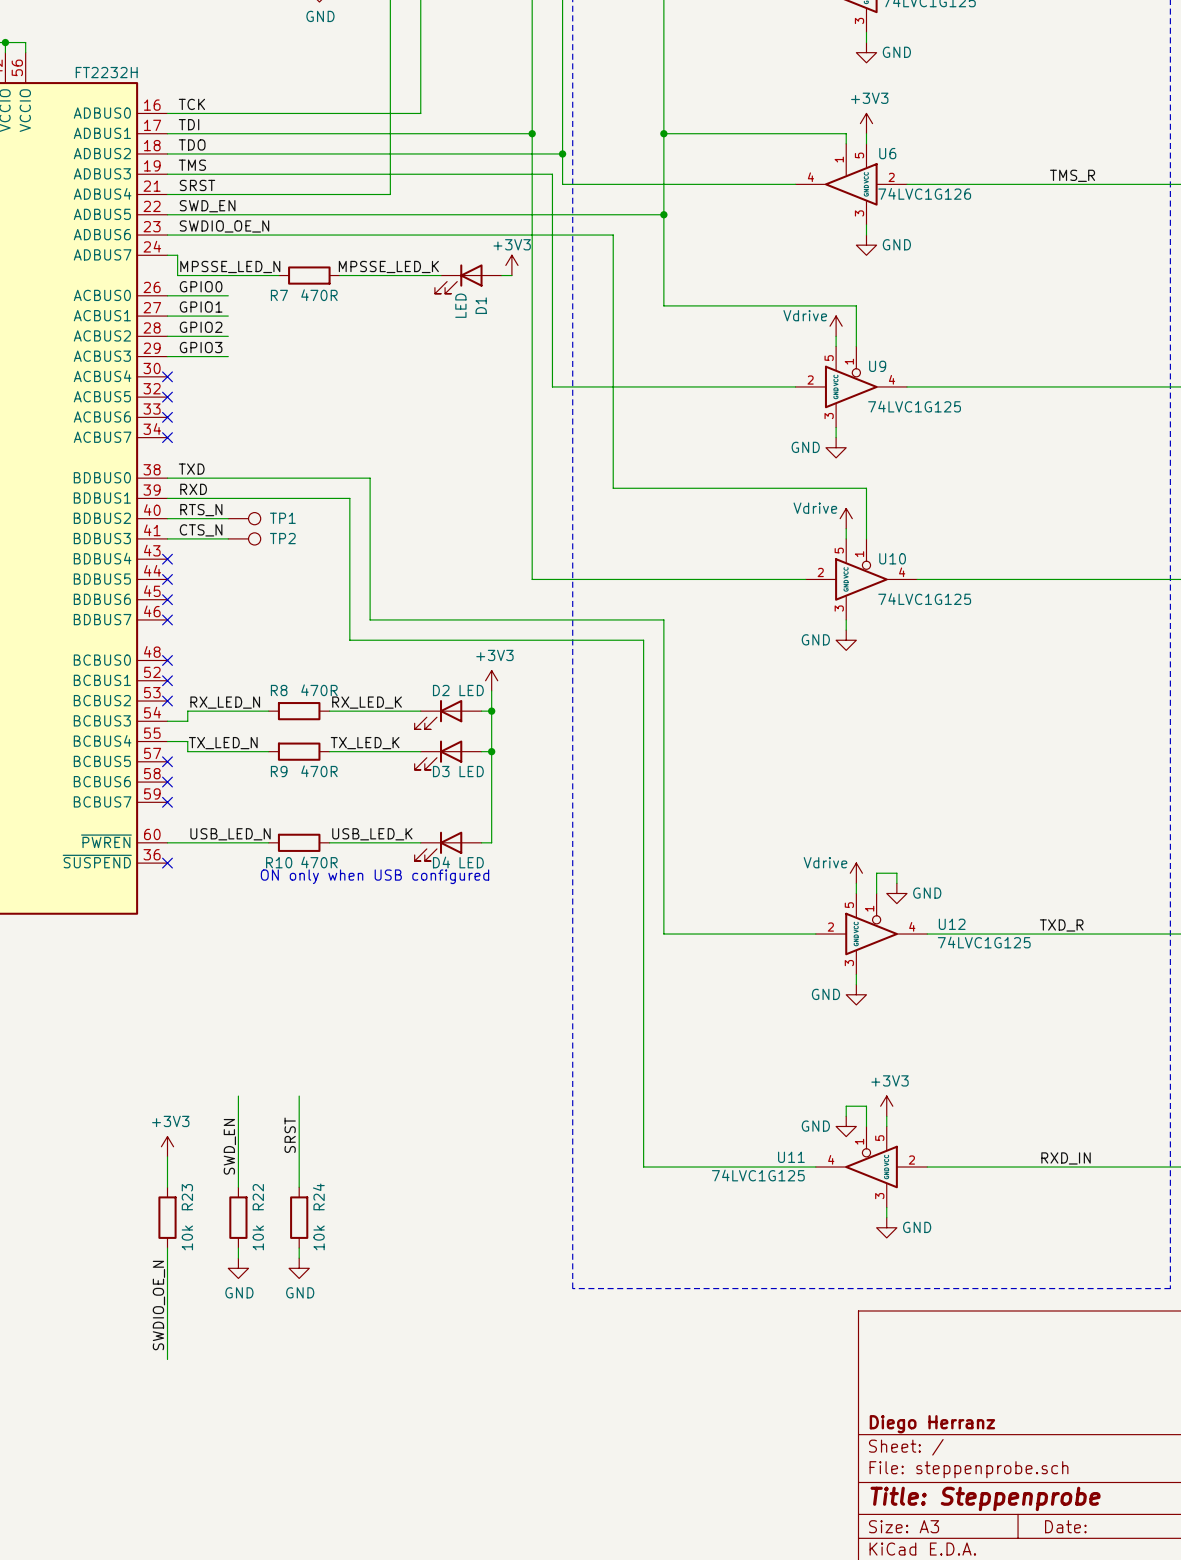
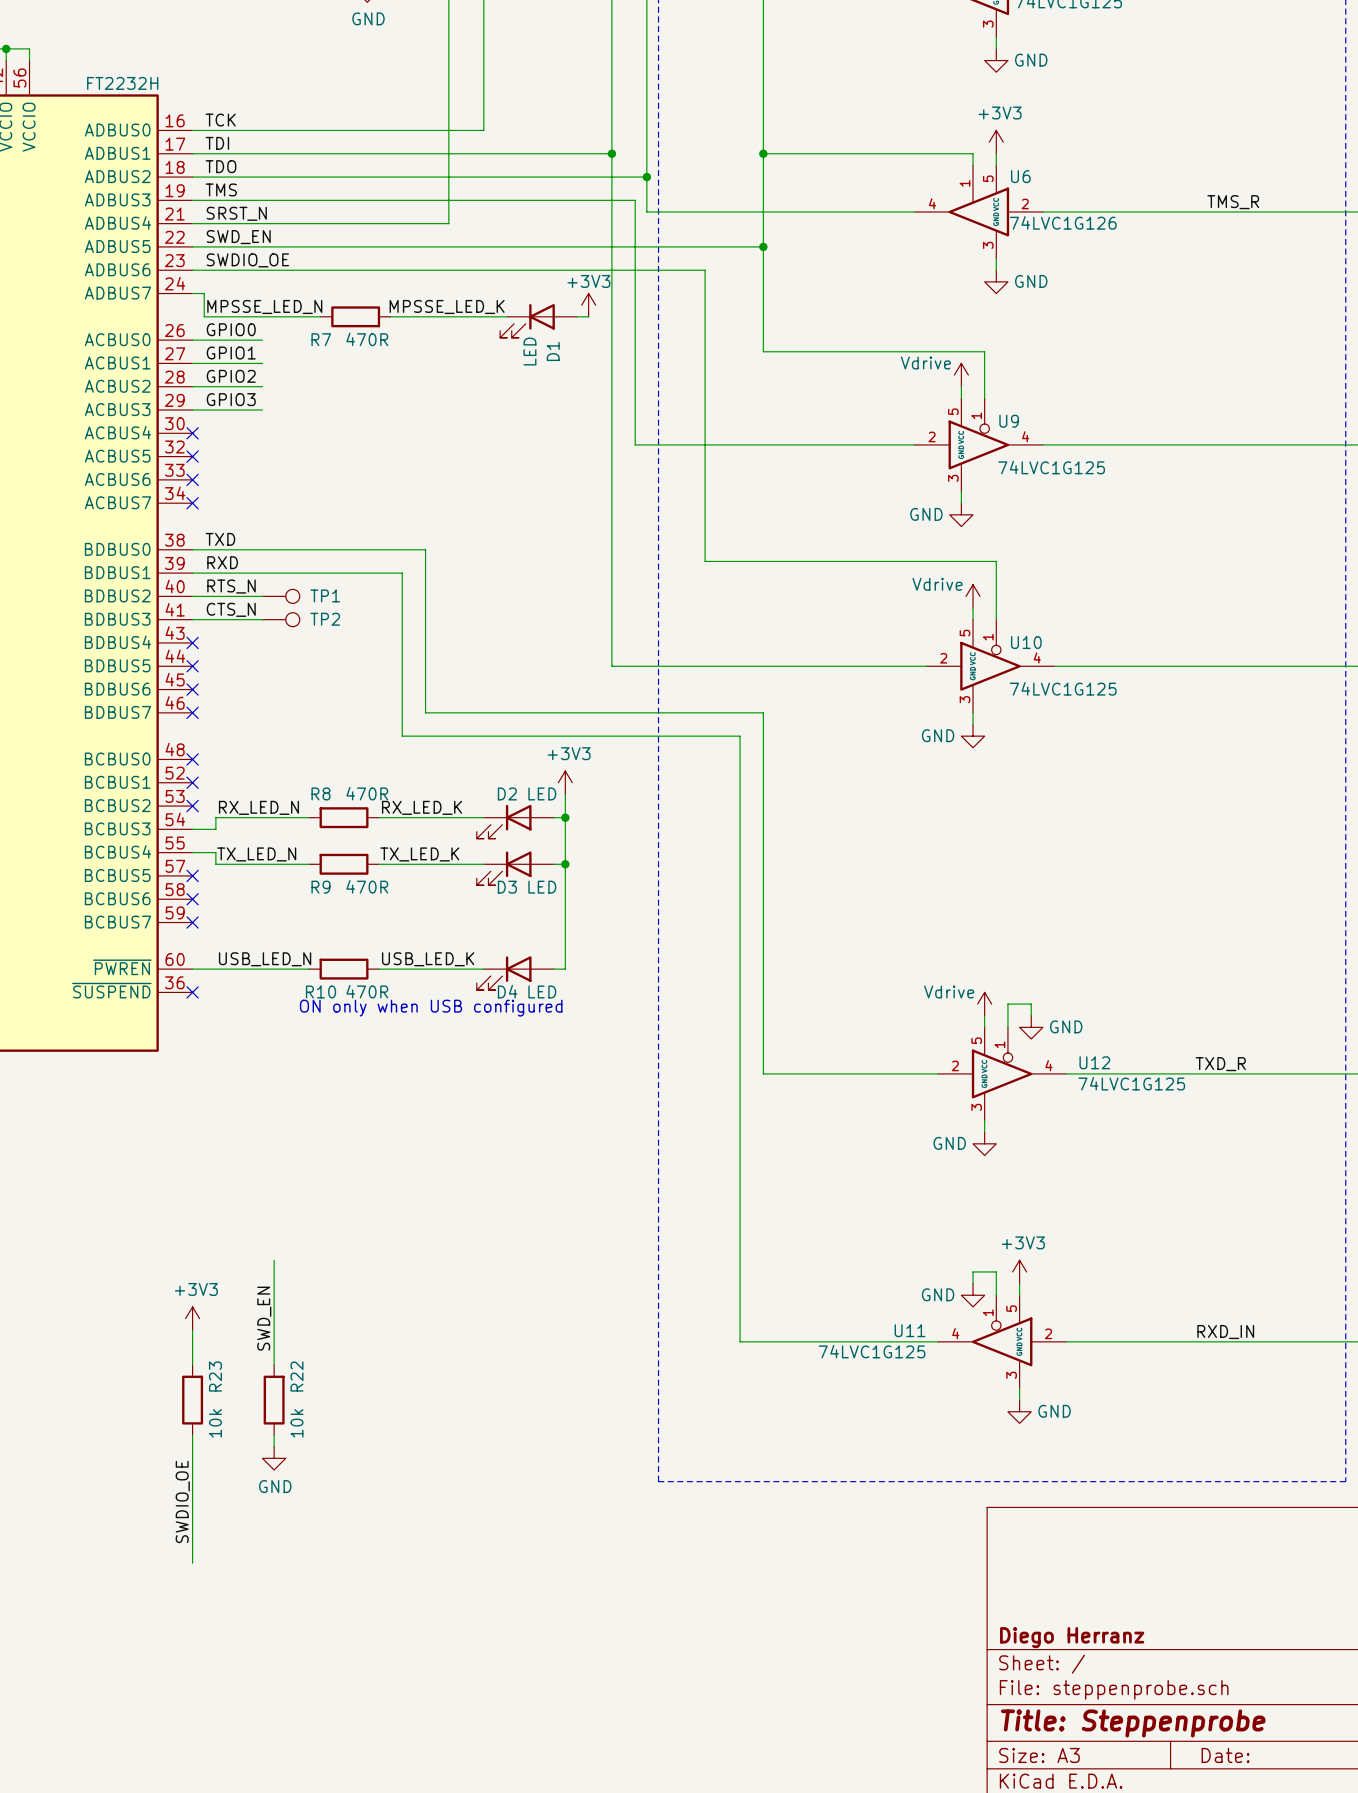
label: SRST (197, 185) -> SRST_N (236, 213)
label: SWDIO_OE_N (224, 226) -> SWDIO_OE (247, 260)
wire: (299, 1096) (299, 1187) -> none
label: SRST (290, 1135) -> none
R24: 10k (299, 1217) -> none
wire: (299, 1248) (299, 1258) -> none
power symbol: GND (299, 1268) -> none
label: SWDIO_OE_N (158, 1305) -> SWDIO_OE (182, 1501)

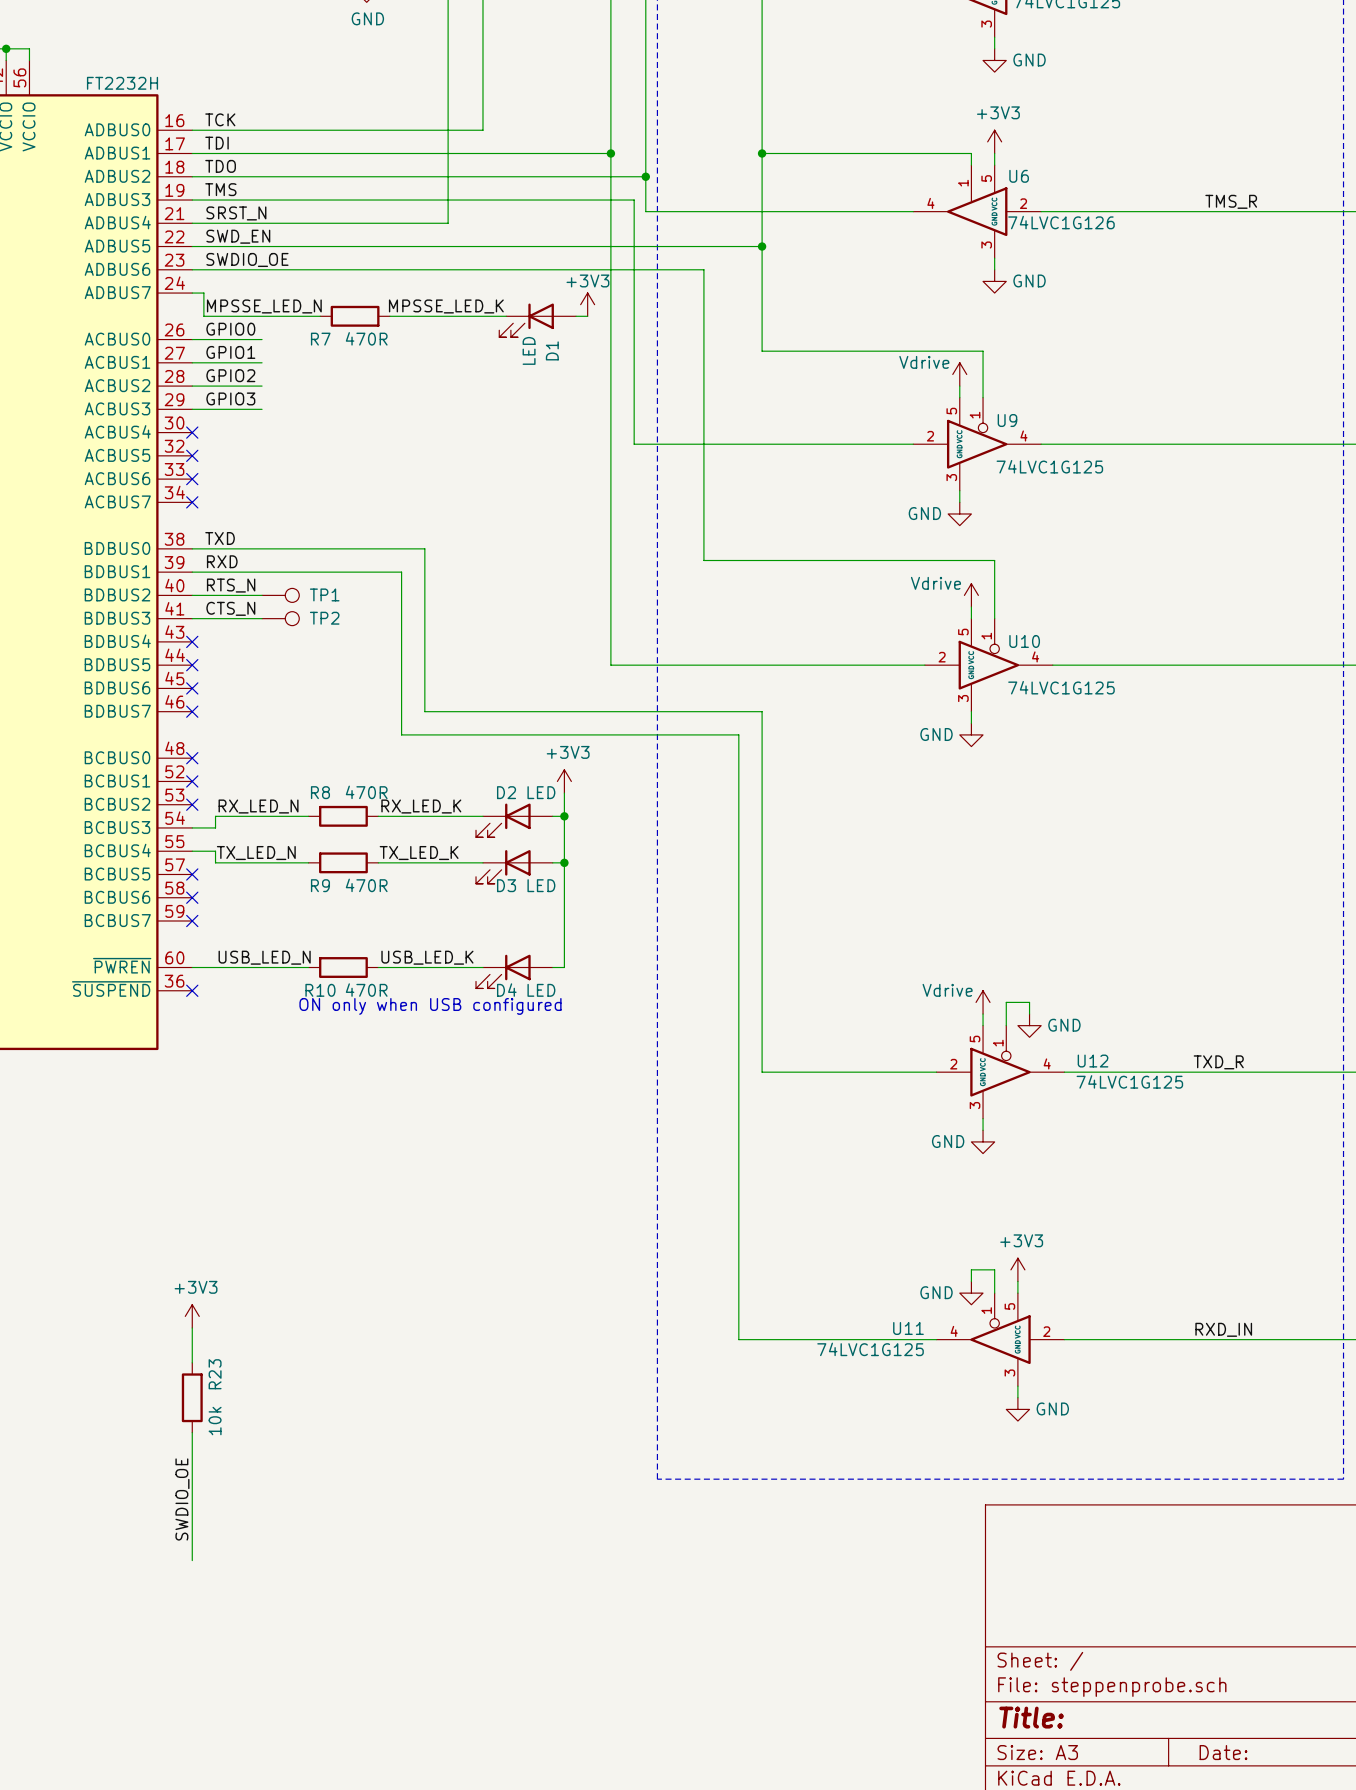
wire: (274, 1260) (274, 1365) -> none
label: SWD_EN (264, 1318) -> none
R22: 10k (274, 1400) -> none
wire: (274, 1435) (274, 1446) -> none
power symbol: GND (274, 1458) -> none
title block: Diego Herranz (1072, 1637) -> none
title block: Title: Steppenprobe (1133, 1723) -> Title: (1031, 1717)

